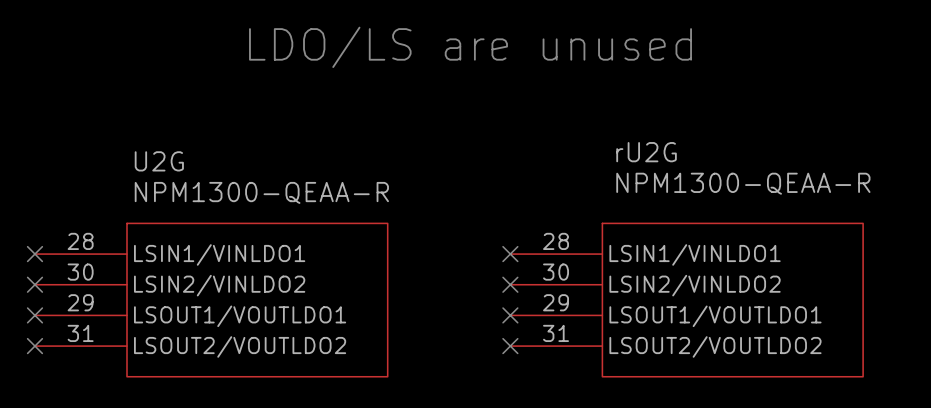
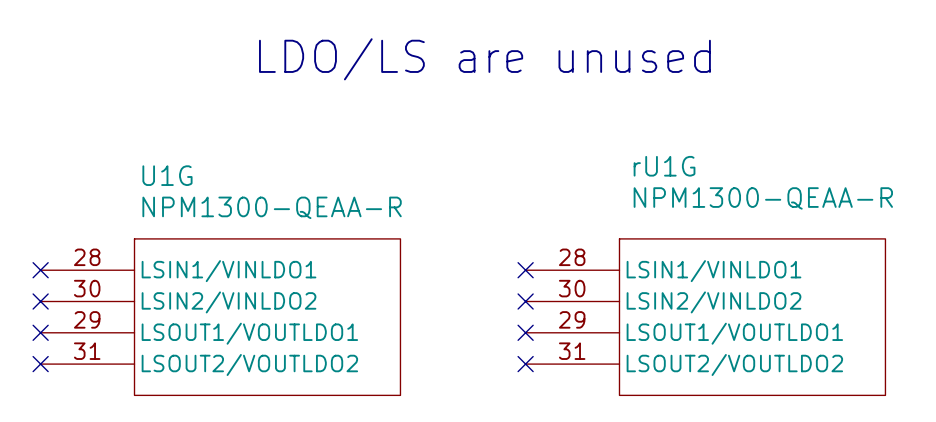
rU2G name: rU2G (646, 152) -> rU1G (664, 166)
U2G name: U2G (159, 161) -> U1G (167, 175)

